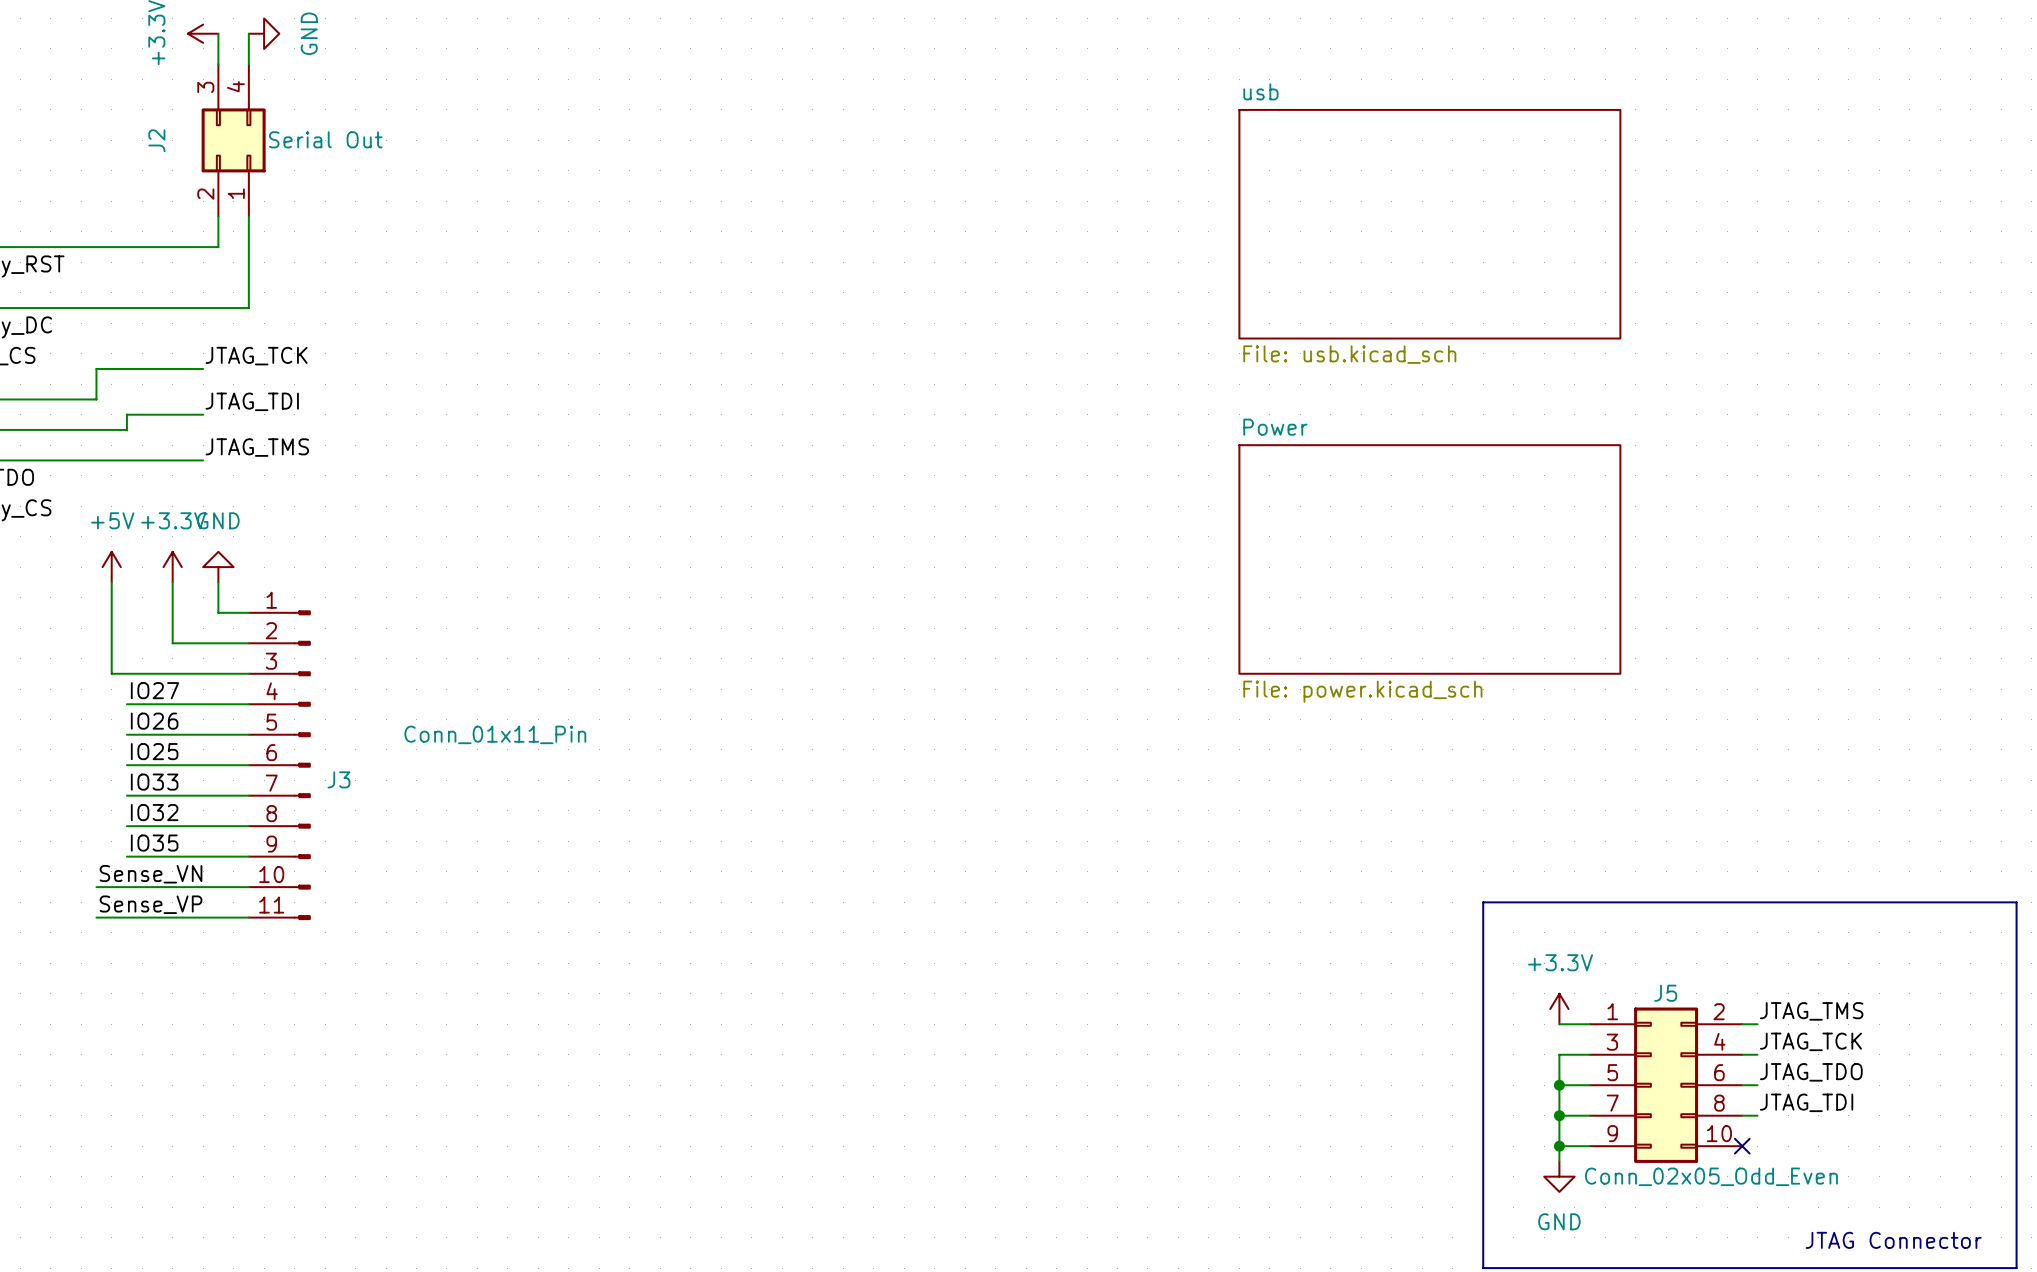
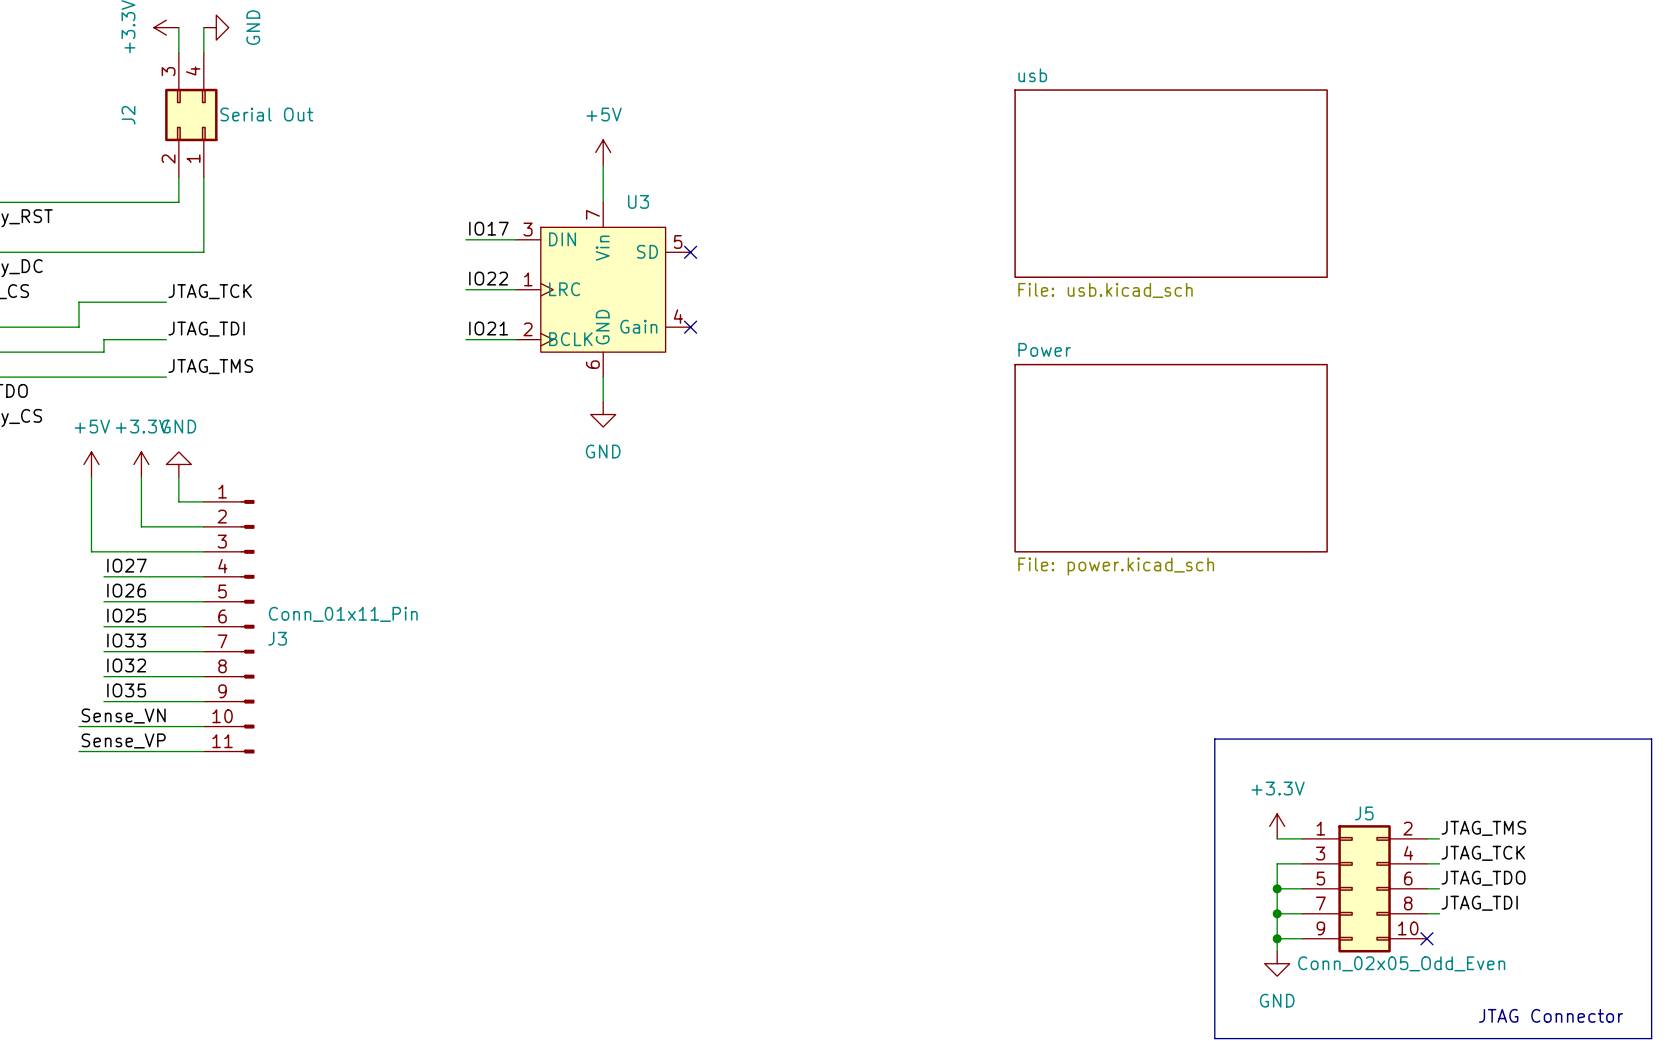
power symbol: none -> +5V (603, 152)
wire: none -> (603, 164) (603, 202)
label: none -> IO17 (488, 228)
wire: none -> (465, 239) (515, 239)
no-connect mark: none -> (690, 252)
label: none -> IO22 (488, 278)
wire: none -> (465, 289) (515, 289)
U3: none -> (603, 289)
no-connect mark: none -> (690, 327)
label: none -> IO21 (488, 328)
wire: none -> (465, 339) (515, 339)
wire: none -> (603, 377) (603, 402)
power symbol: none -> GND (603, 414)
J3 value position: Conn_01x11_Pin (495, 734) -> Conn_01x11_Pin (343, 614)

